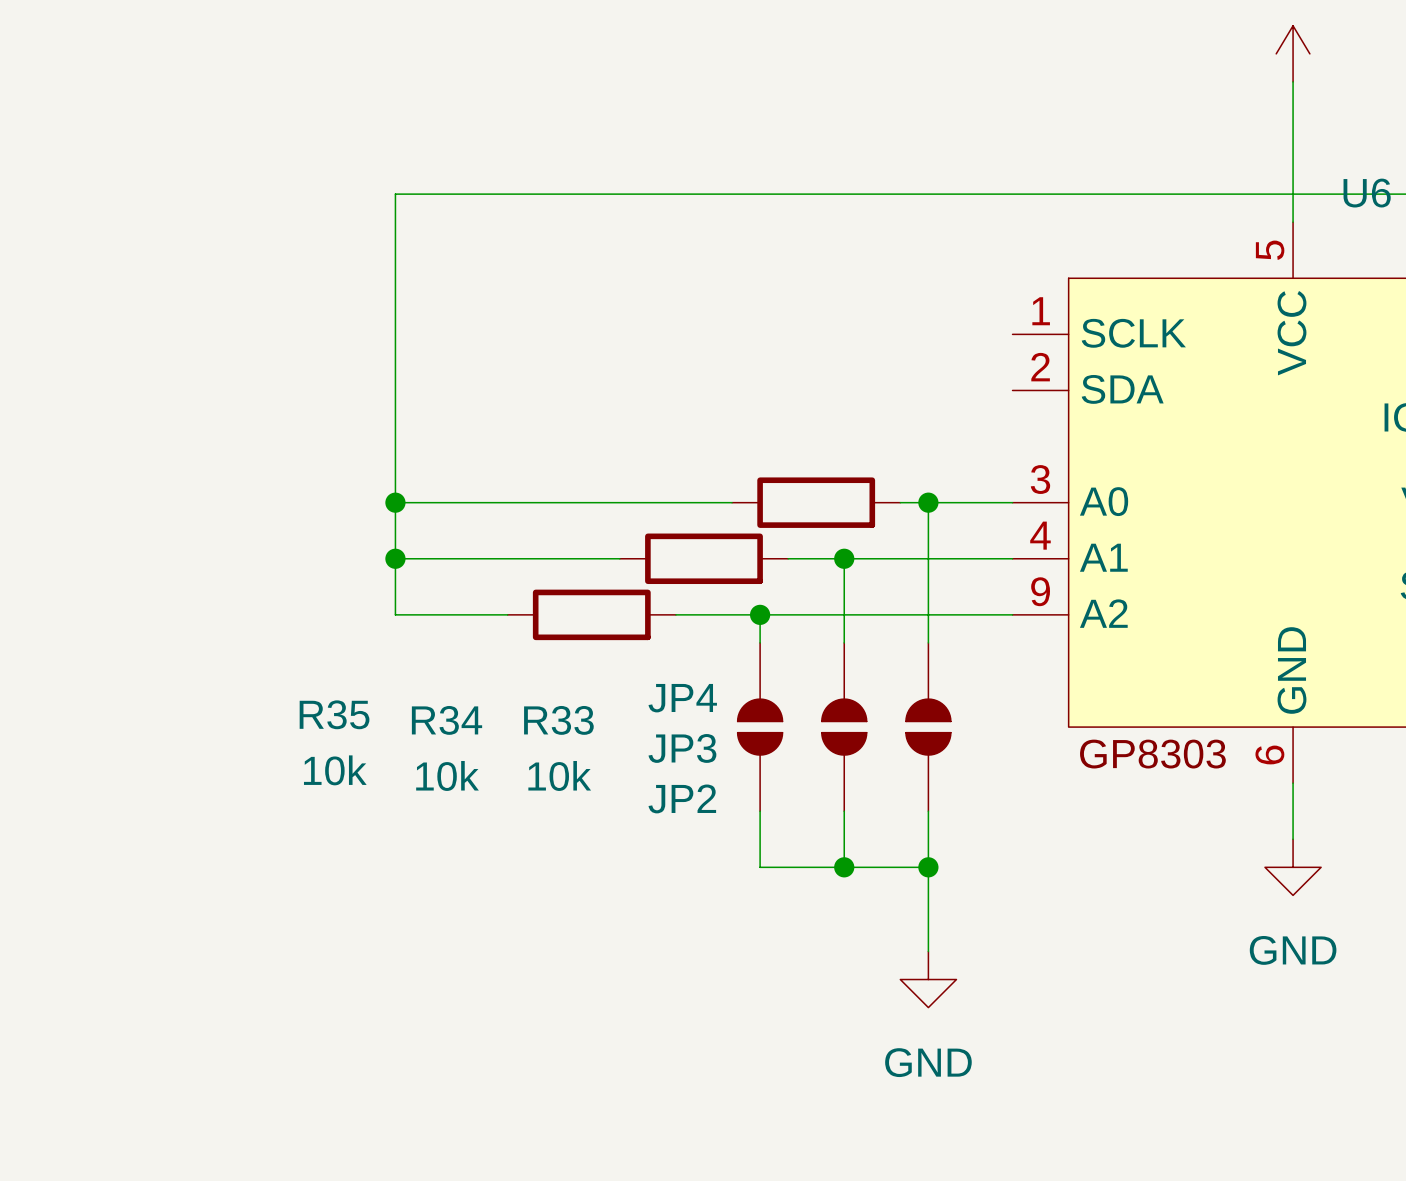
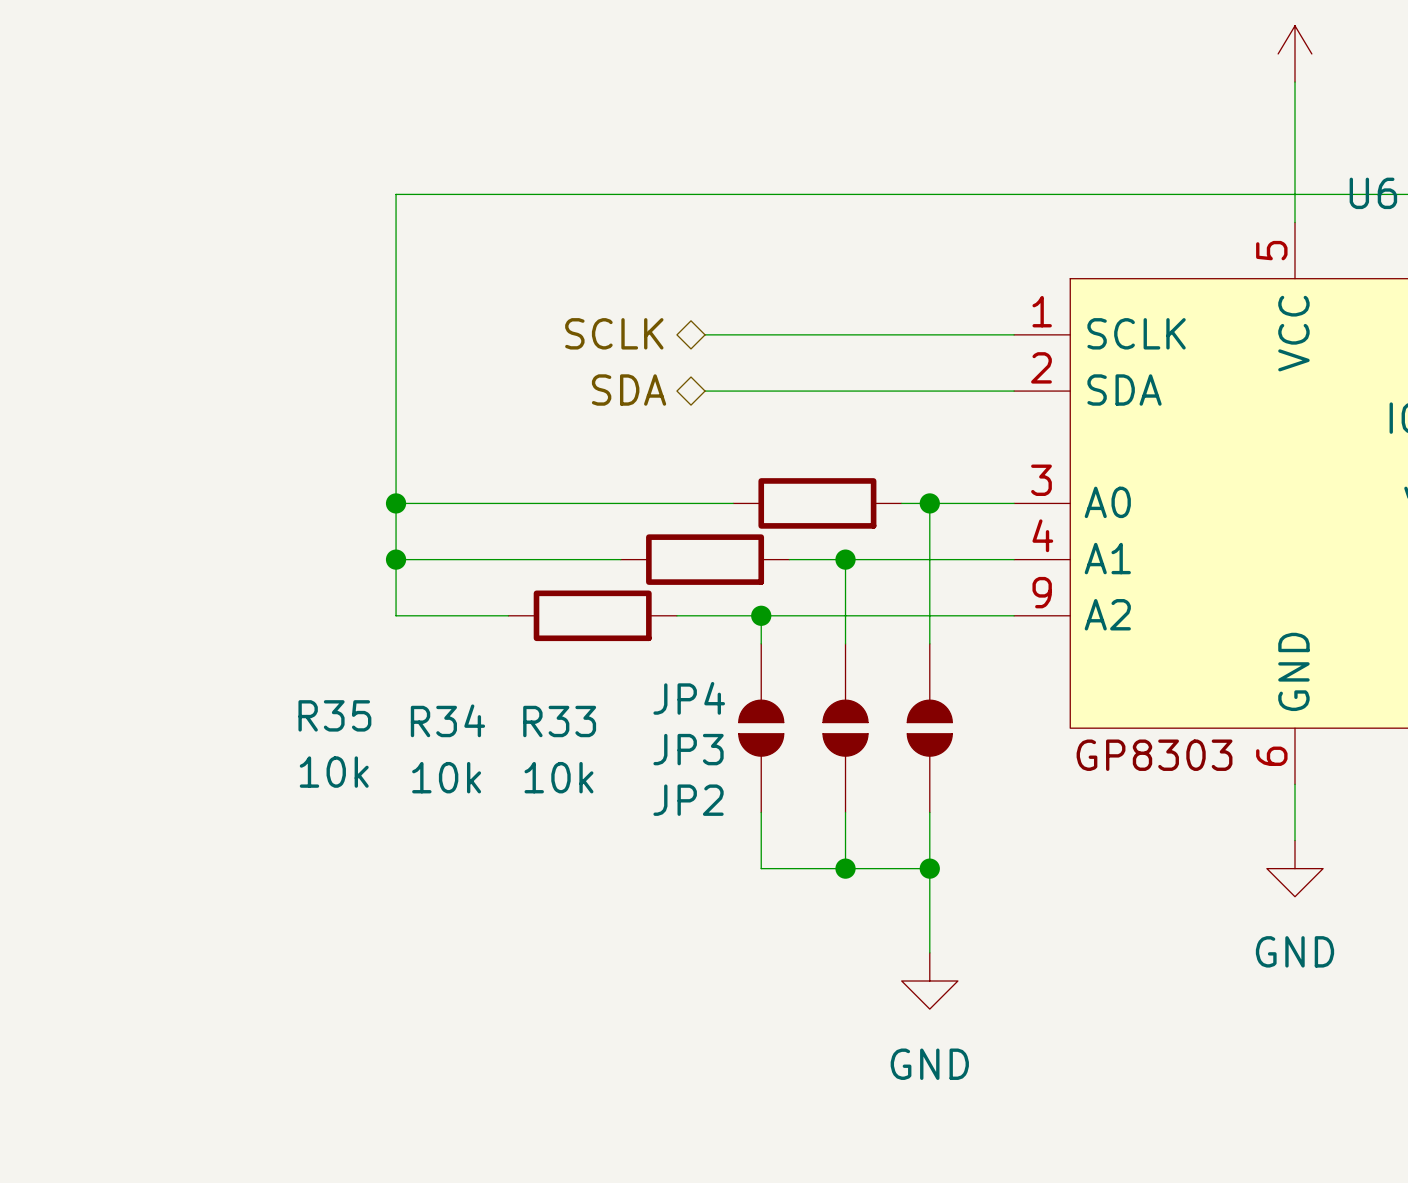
hierarchical label: none -> SCLK (614, 333)
wire: none -> (705, 334) (1014, 334)
hierarchical label: none -> SDA (629, 390)
wire: none -> (705, 391) (1014, 391)

